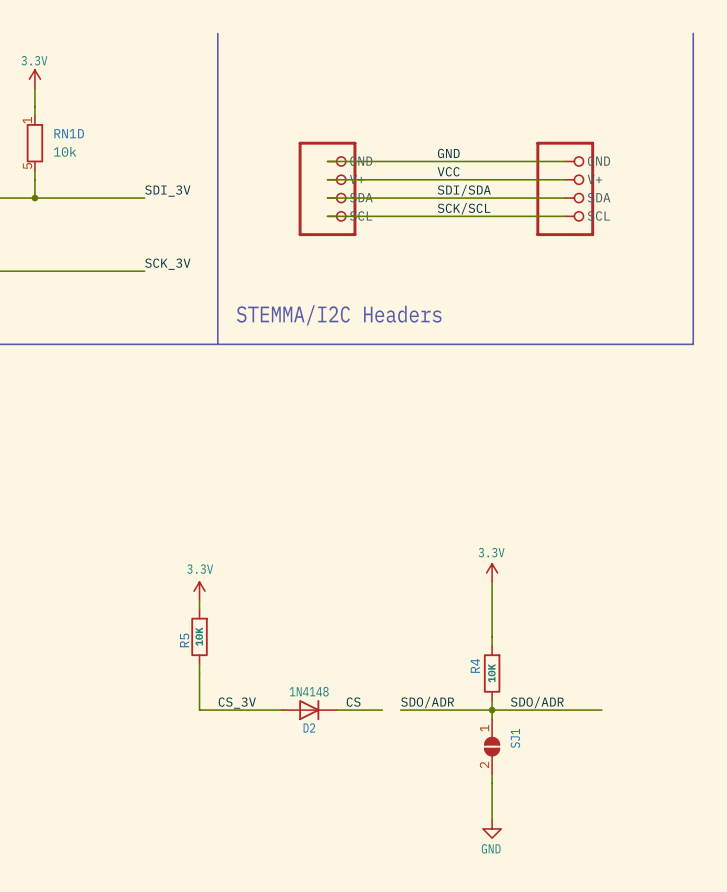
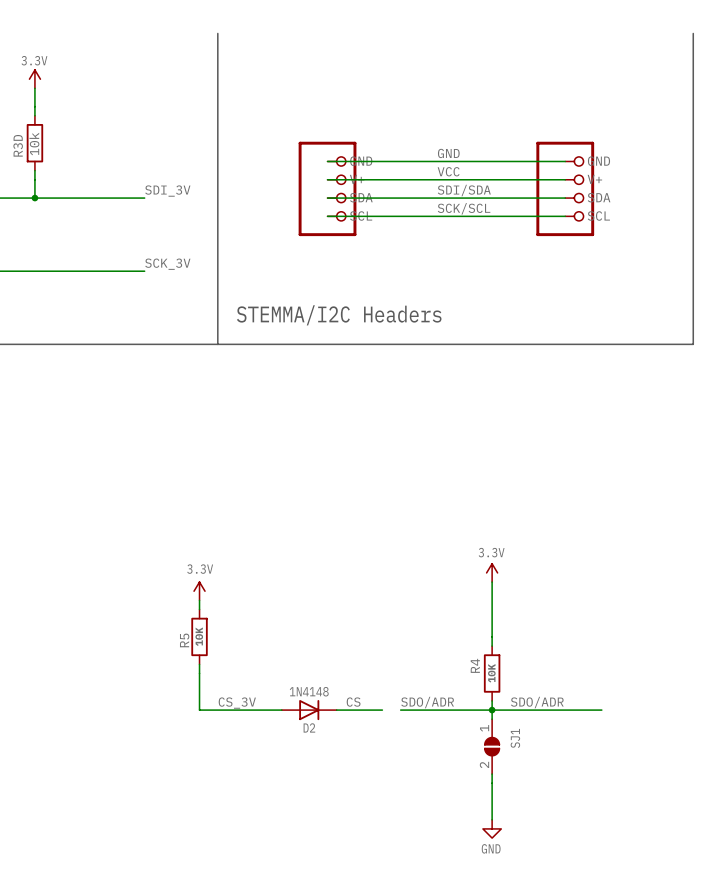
RN1D pin number: 1 (27, 120) -> none
RN1D name: RN1D (69, 133) -> R3D (18, 145)
RN1D value rotation: 0° (65, 151) -> 90° counterclockwise (34, 144)
RN1D value position: 10k (65, 151) -> 10k (34, 144)
RN1D pin number: 5 (27, 166) -> none

